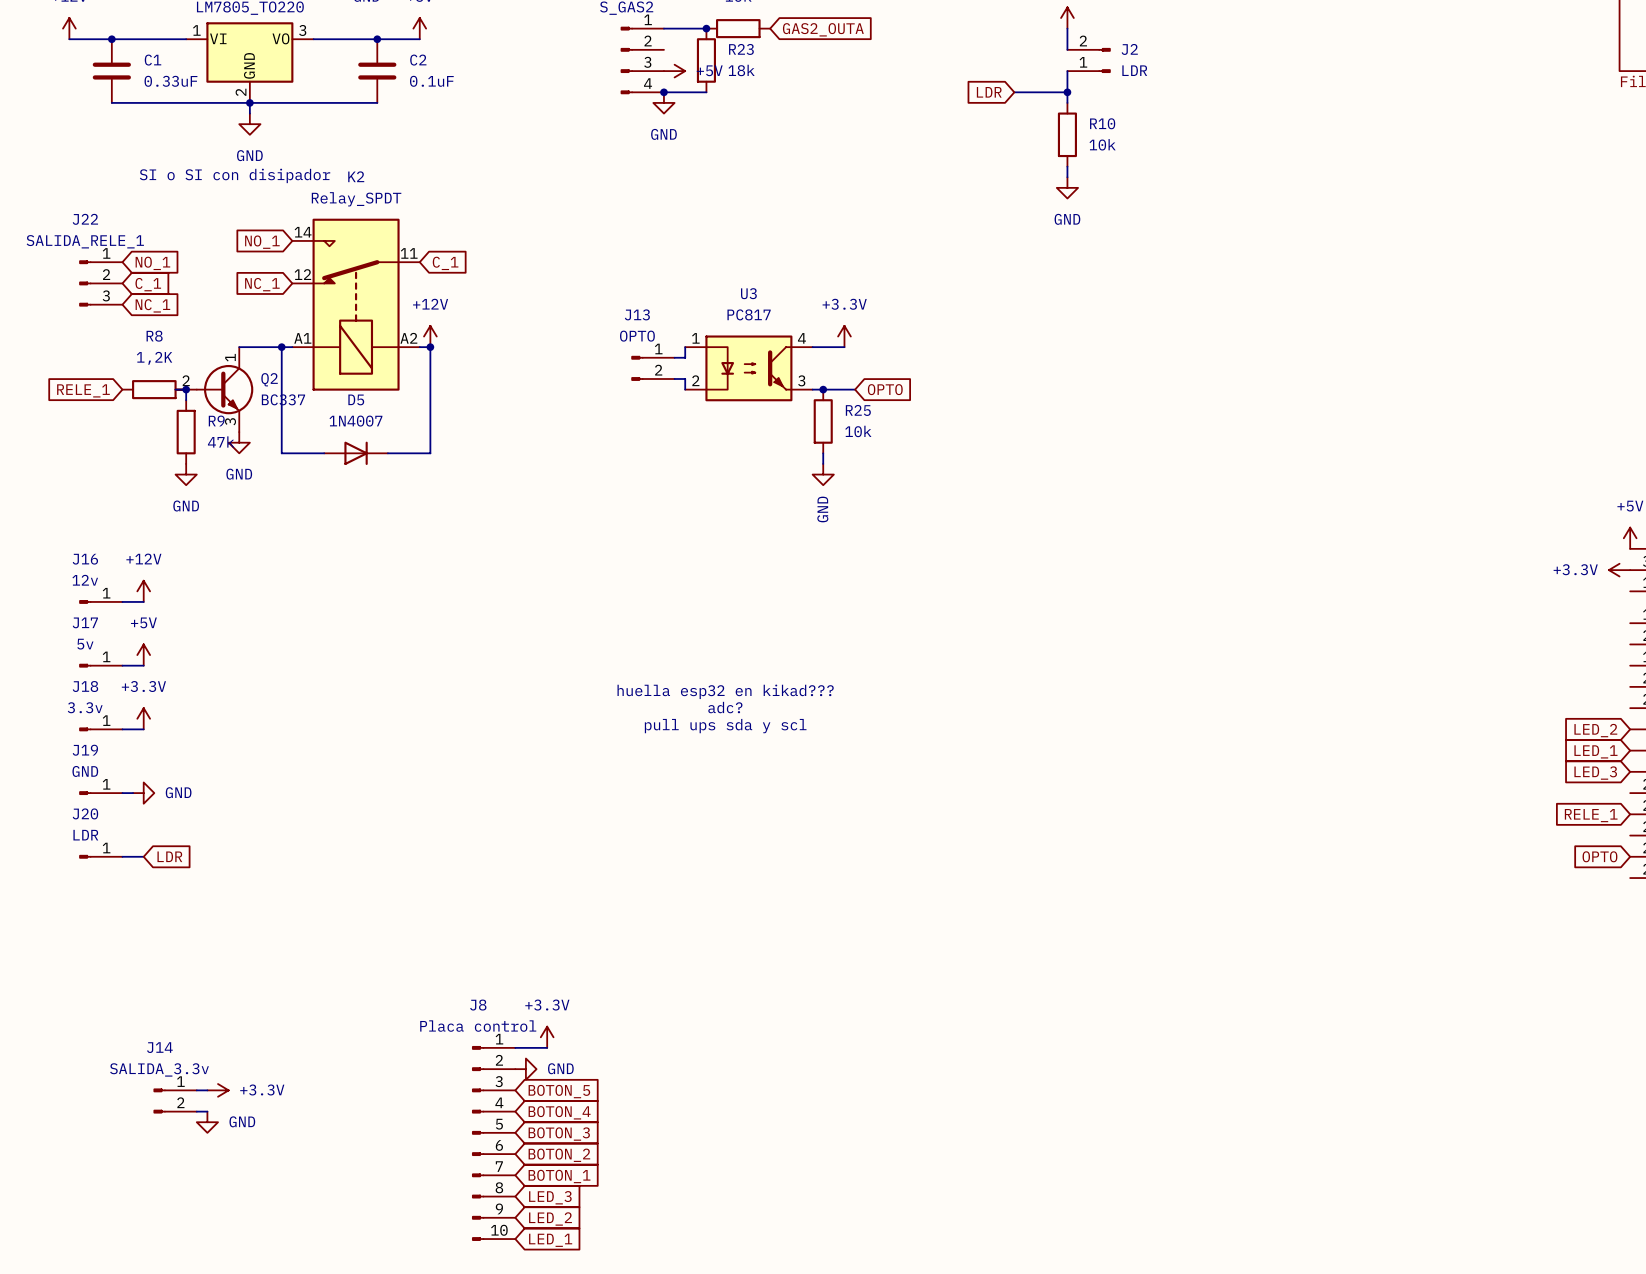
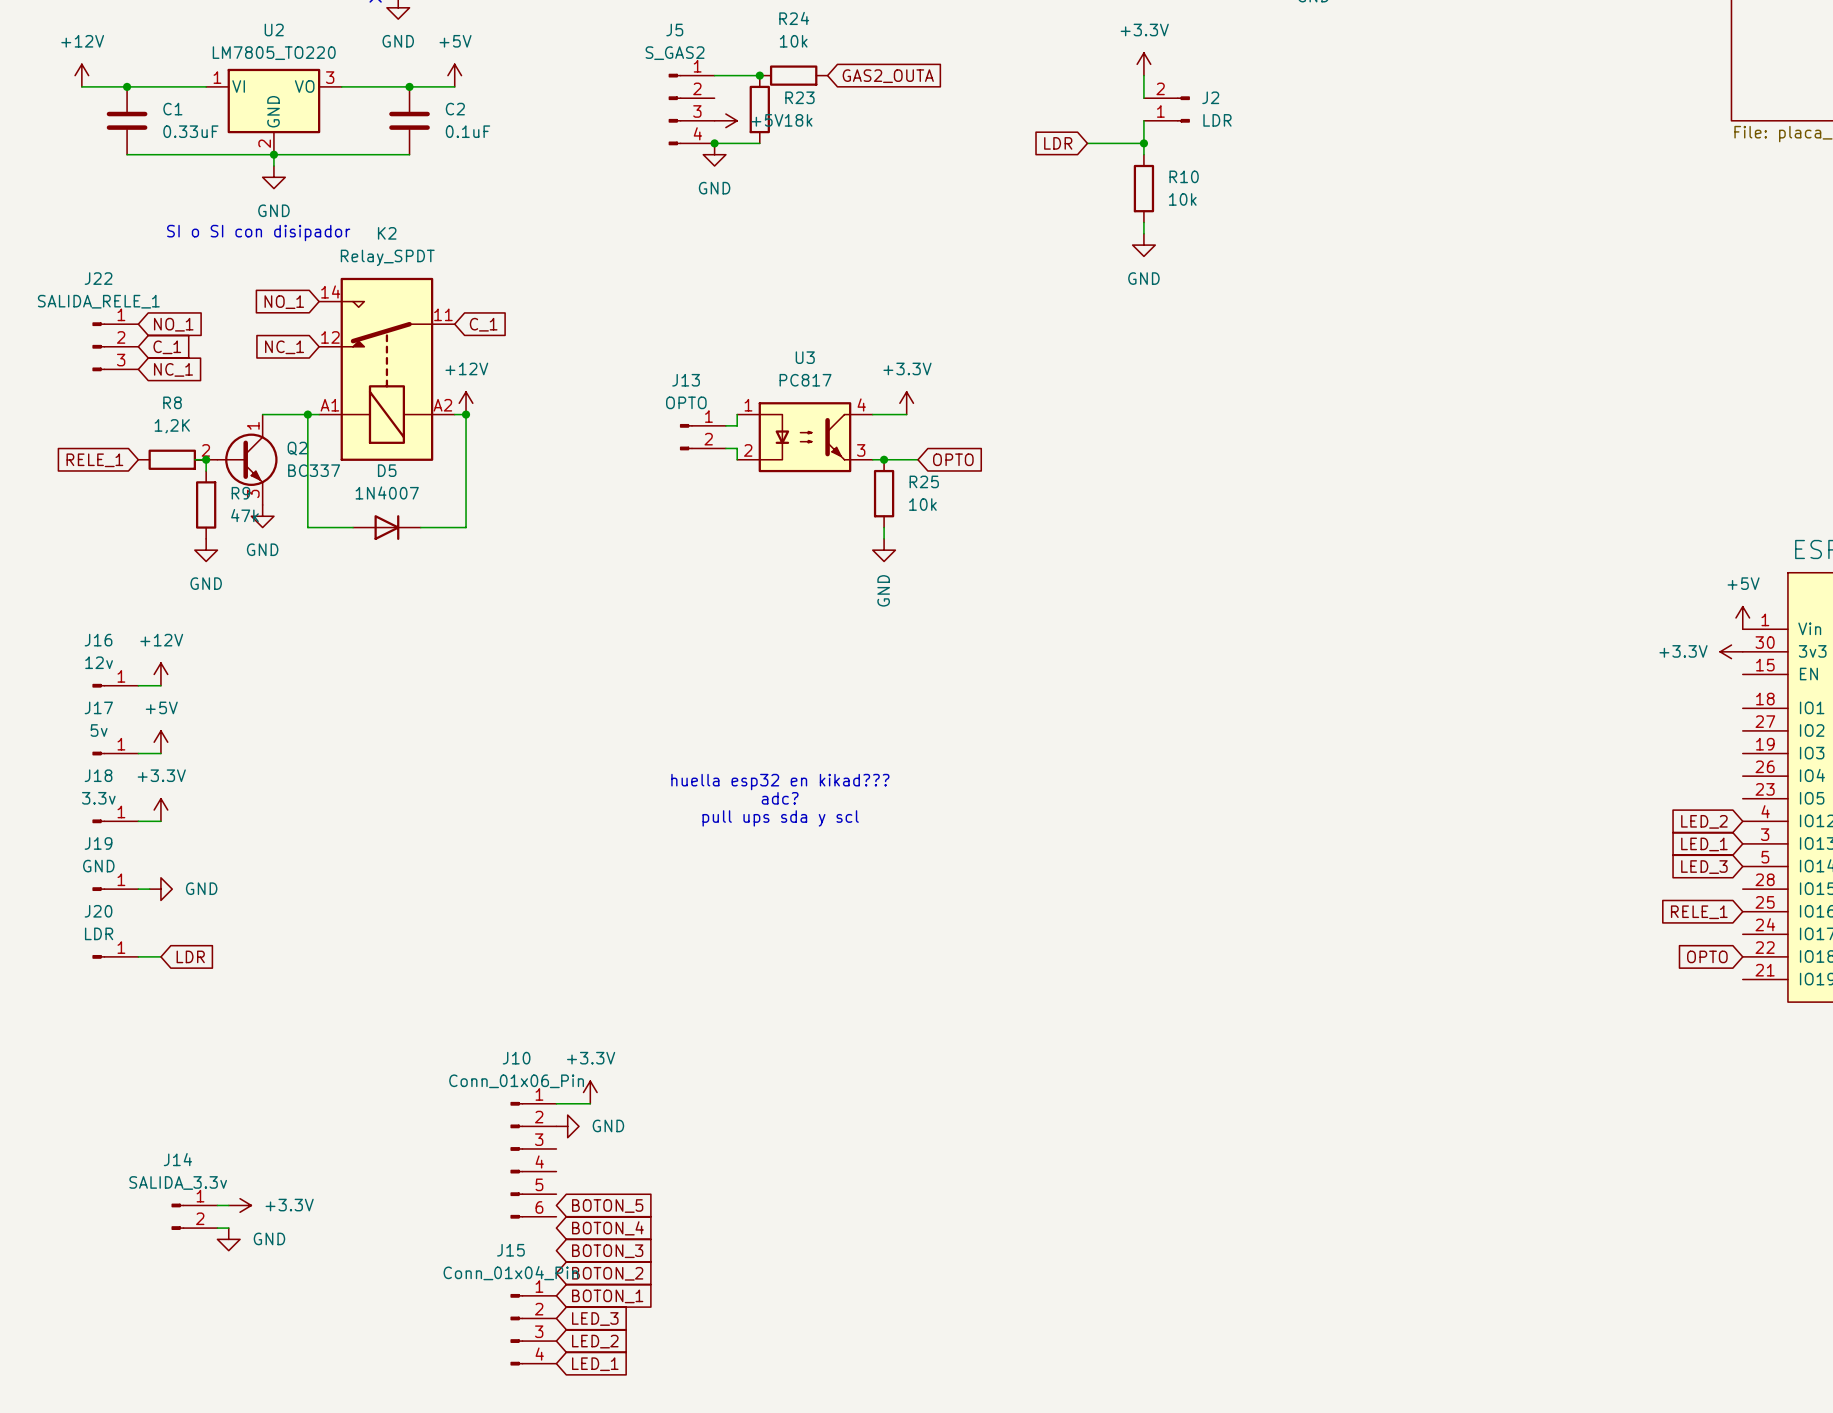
power symbol position: +3.3V (547, 1037) -> +3.3V (590, 1092)
J10: none -> Conn_01x06_Pin (533, 1160)
wire: (515, 1047) (547, 1047) -> (556, 1103) (590, 1103)
power symbol position: GND (525, 1069) -> GND (567, 1126)
J8: Placa control (493, 1143) -> none
J15: none -> Conn_01x04_Pin (533, 1329)

